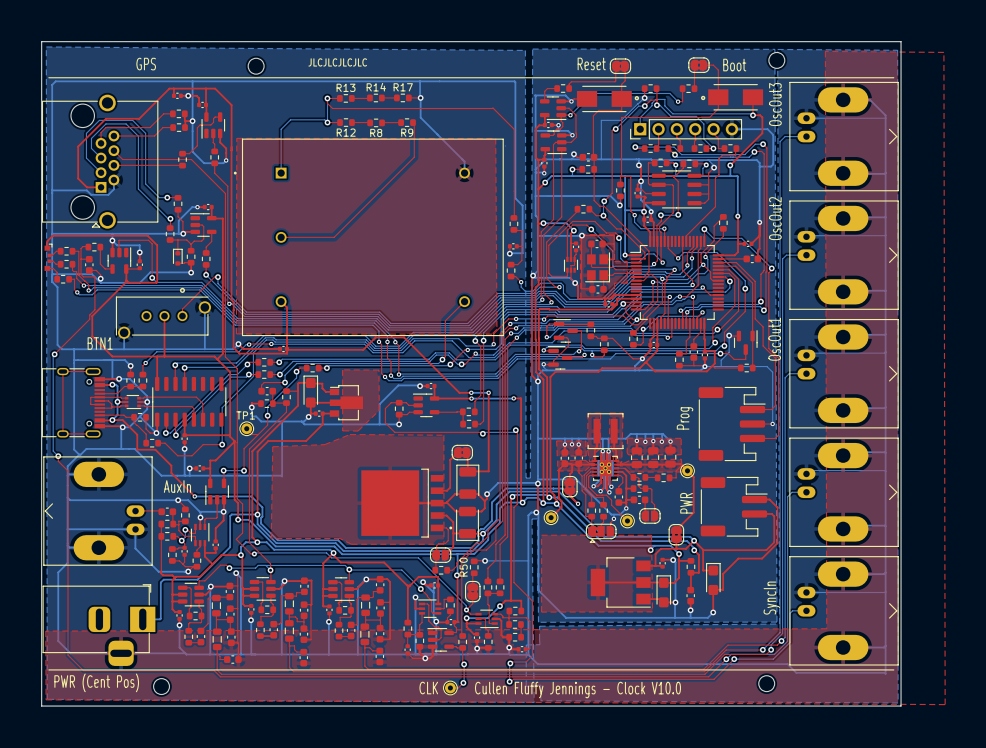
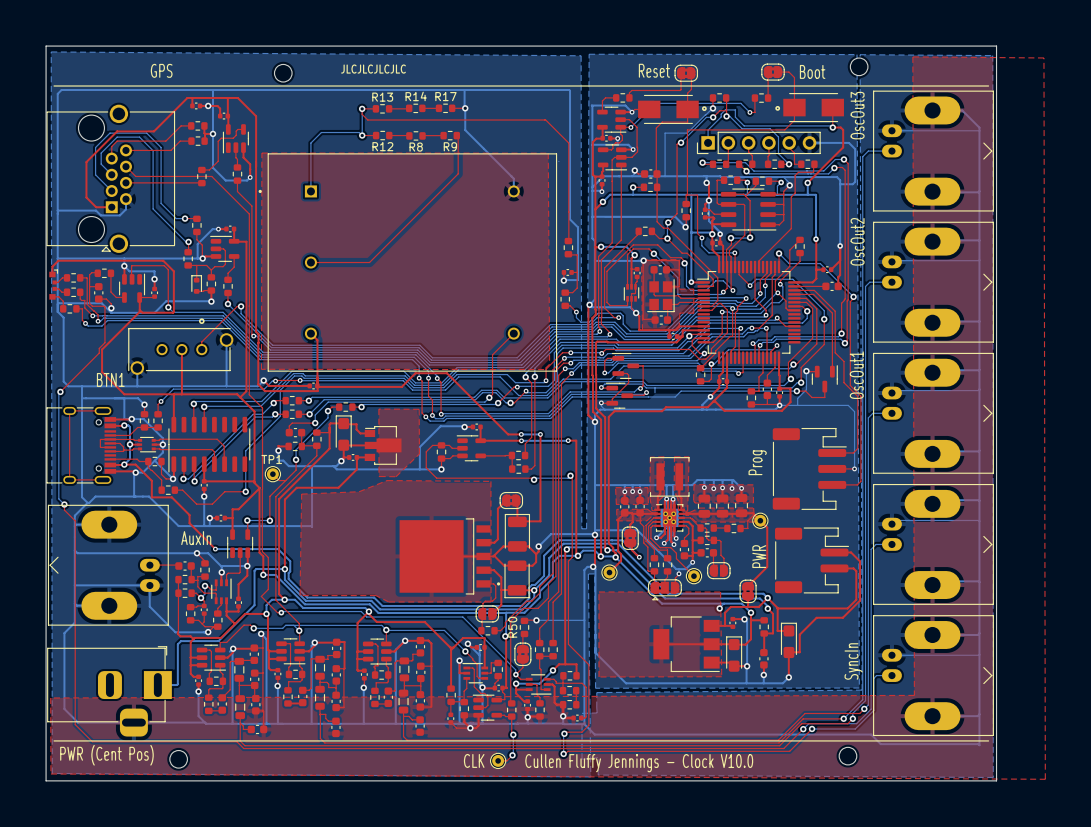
top track: (559, 324) (590, 324) -> none
part: (590, 330) -> none
top track: (590, 336) (612, 338) (633, 358) (642, 358) -> none
top track: (752, 336) (752, 368) -> none
part: (604, 344) -> none
top track: (604, 350) (602, 356) (594, 356) (592, 354) -> none
via: (592, 354) -> none
top track: (712, 365) (714, 368) (740, 368) -> none
part: (746, 368) -> none

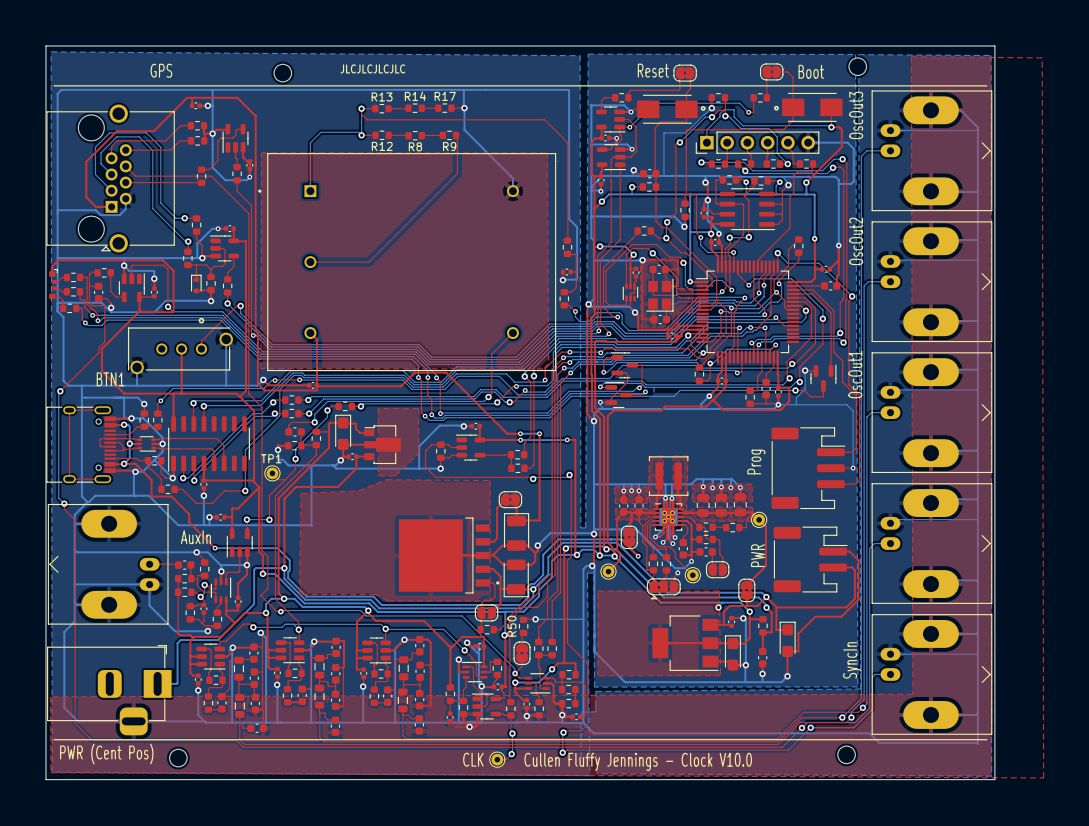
top track: (227, 98) (228, 129) -> none
top track: (208, 105) (217, 105) (220, 108) (220, 116) -> none
part rotation: 0° (224, 116) -> 90° clockwise (249, 165)
part position: (224, 116) -> (249, 165)
top track: none -> (227, 129) (216, 129) (212, 133)

